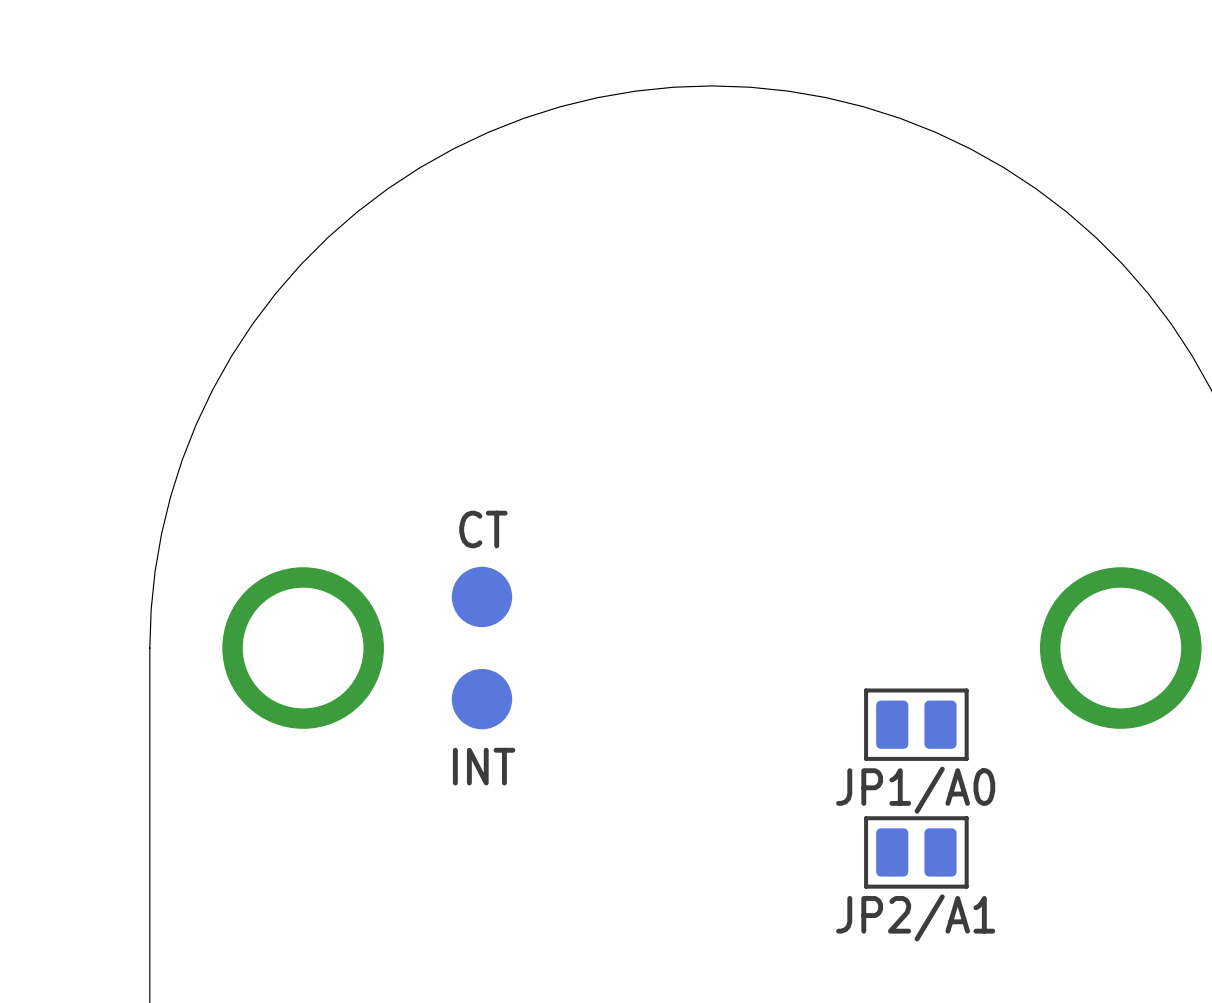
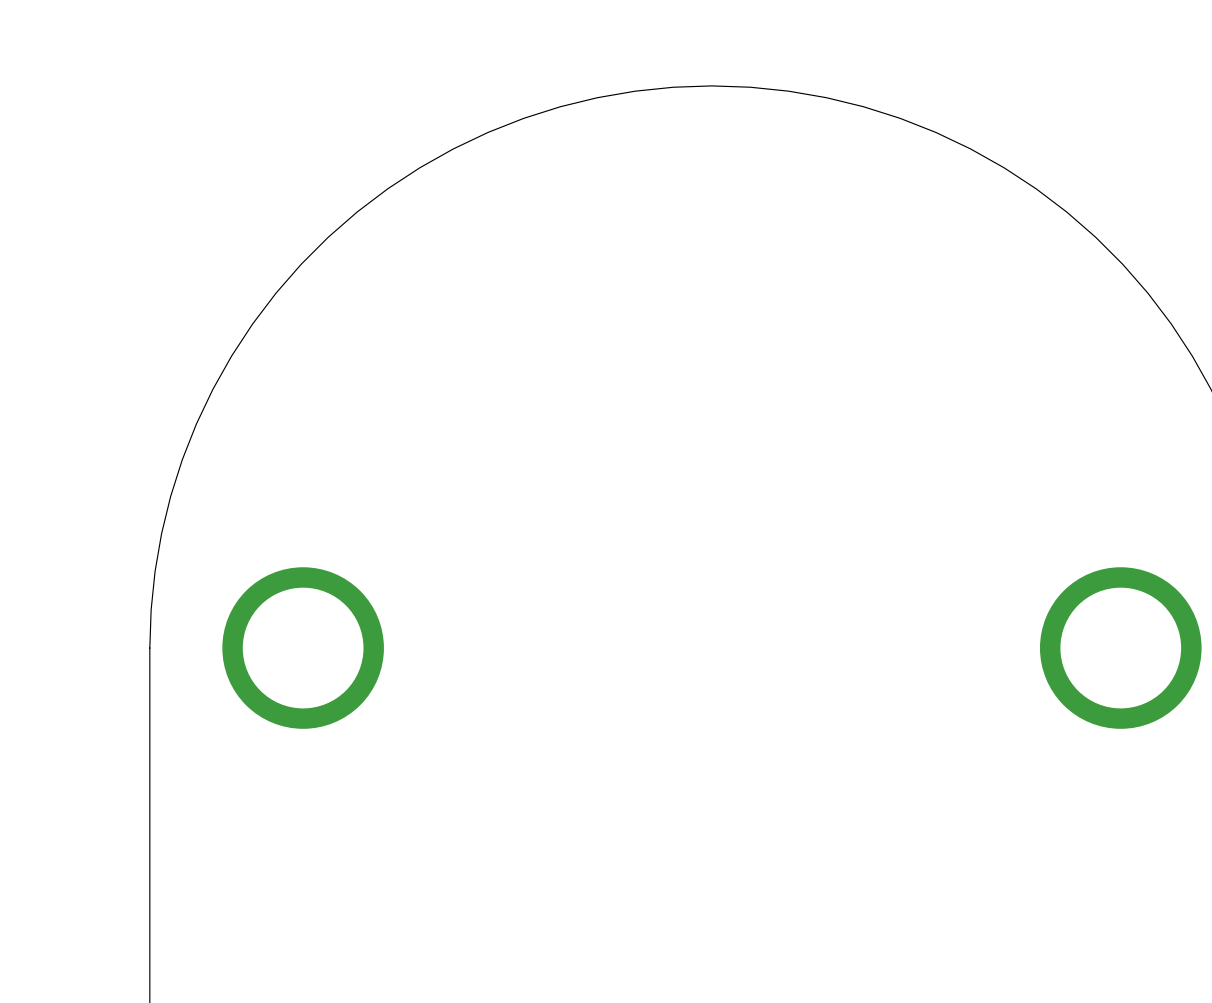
text: CT (483, 529) -> none
part: (481, 596) -> none
part: (481, 699) -> none
part: (916, 724) -> none
text: INT (484, 766) -> none
text: JP1/A0 (915, 790) -> none
part: (916, 852) -> none
text: JP2/A1 (915, 917) -> none

